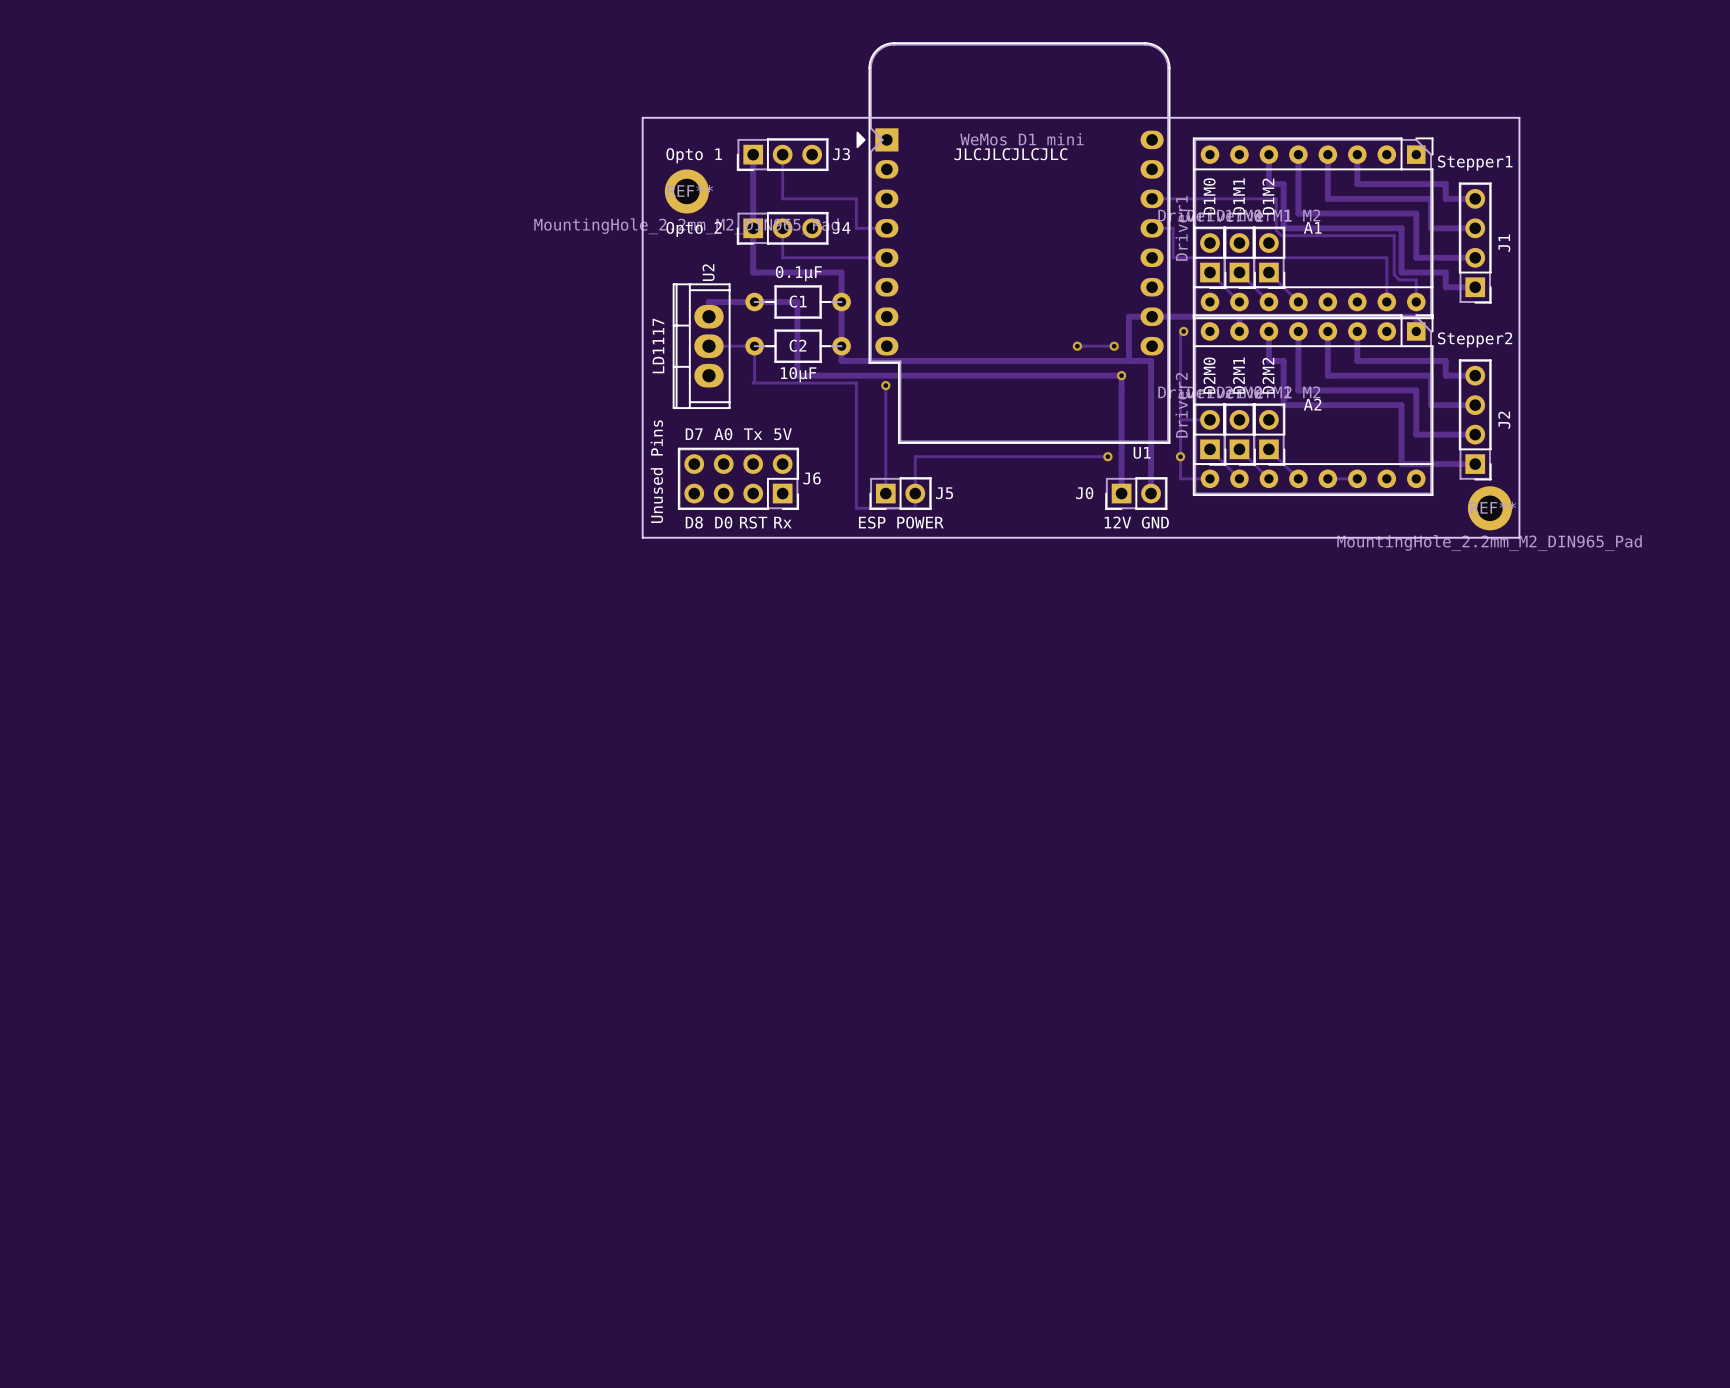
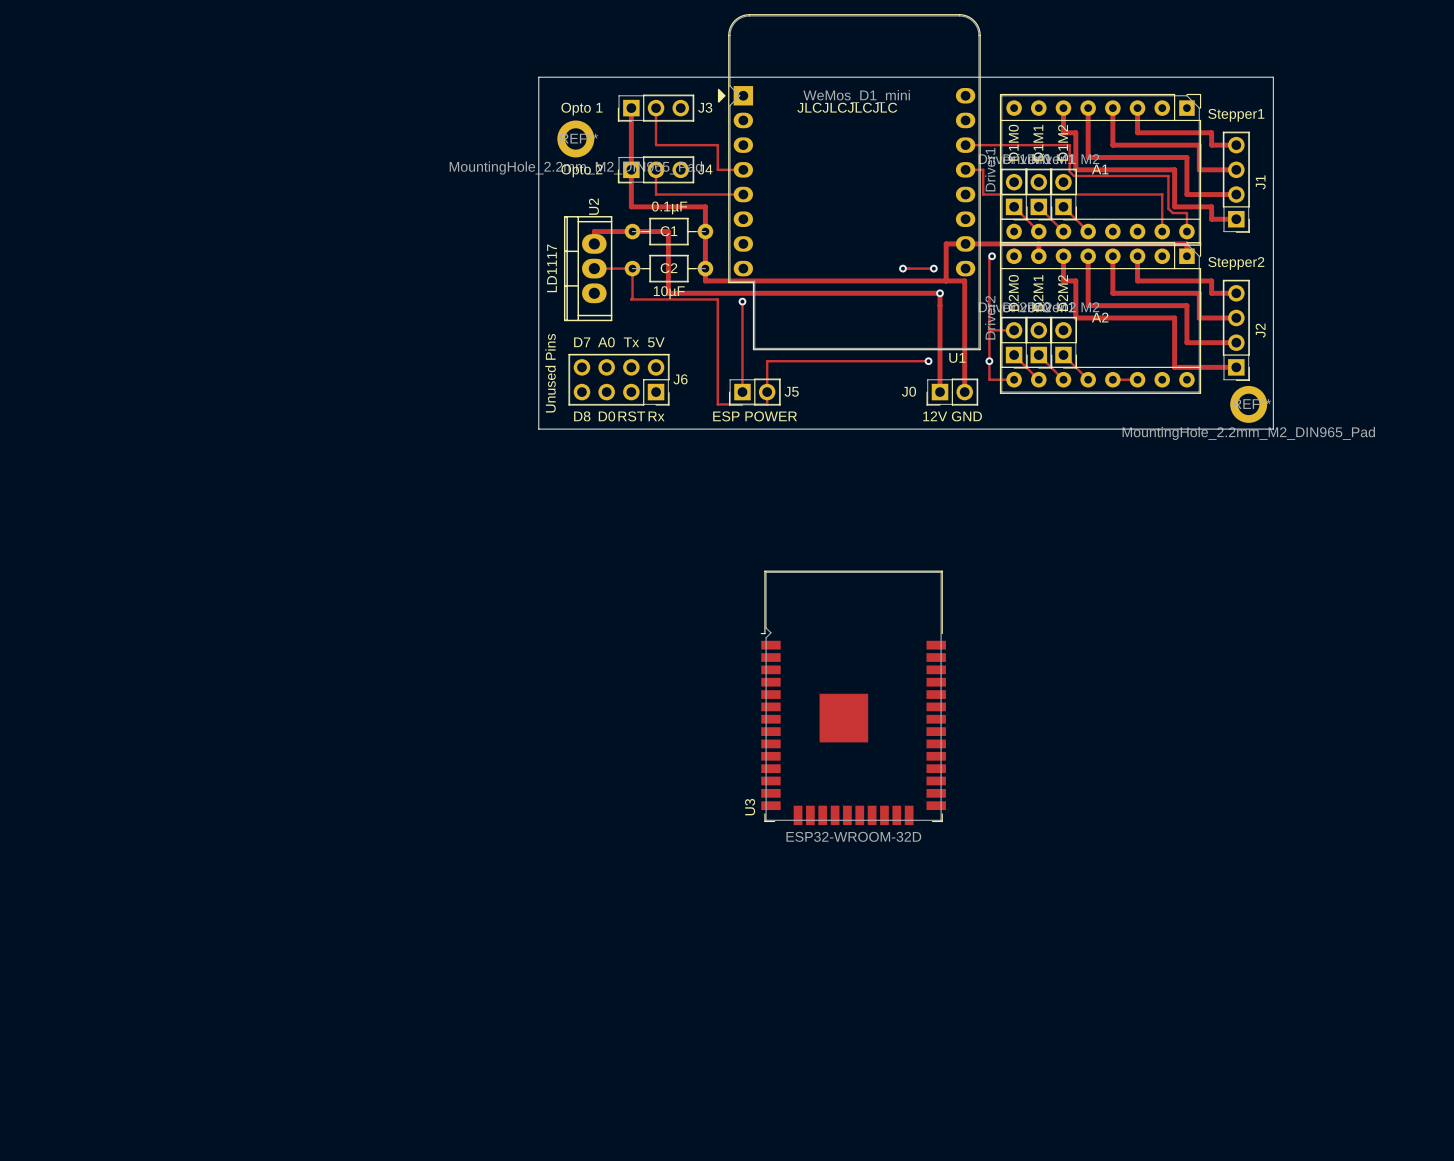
U3: none -> ESP32-WROOM-32D (853, 697)

